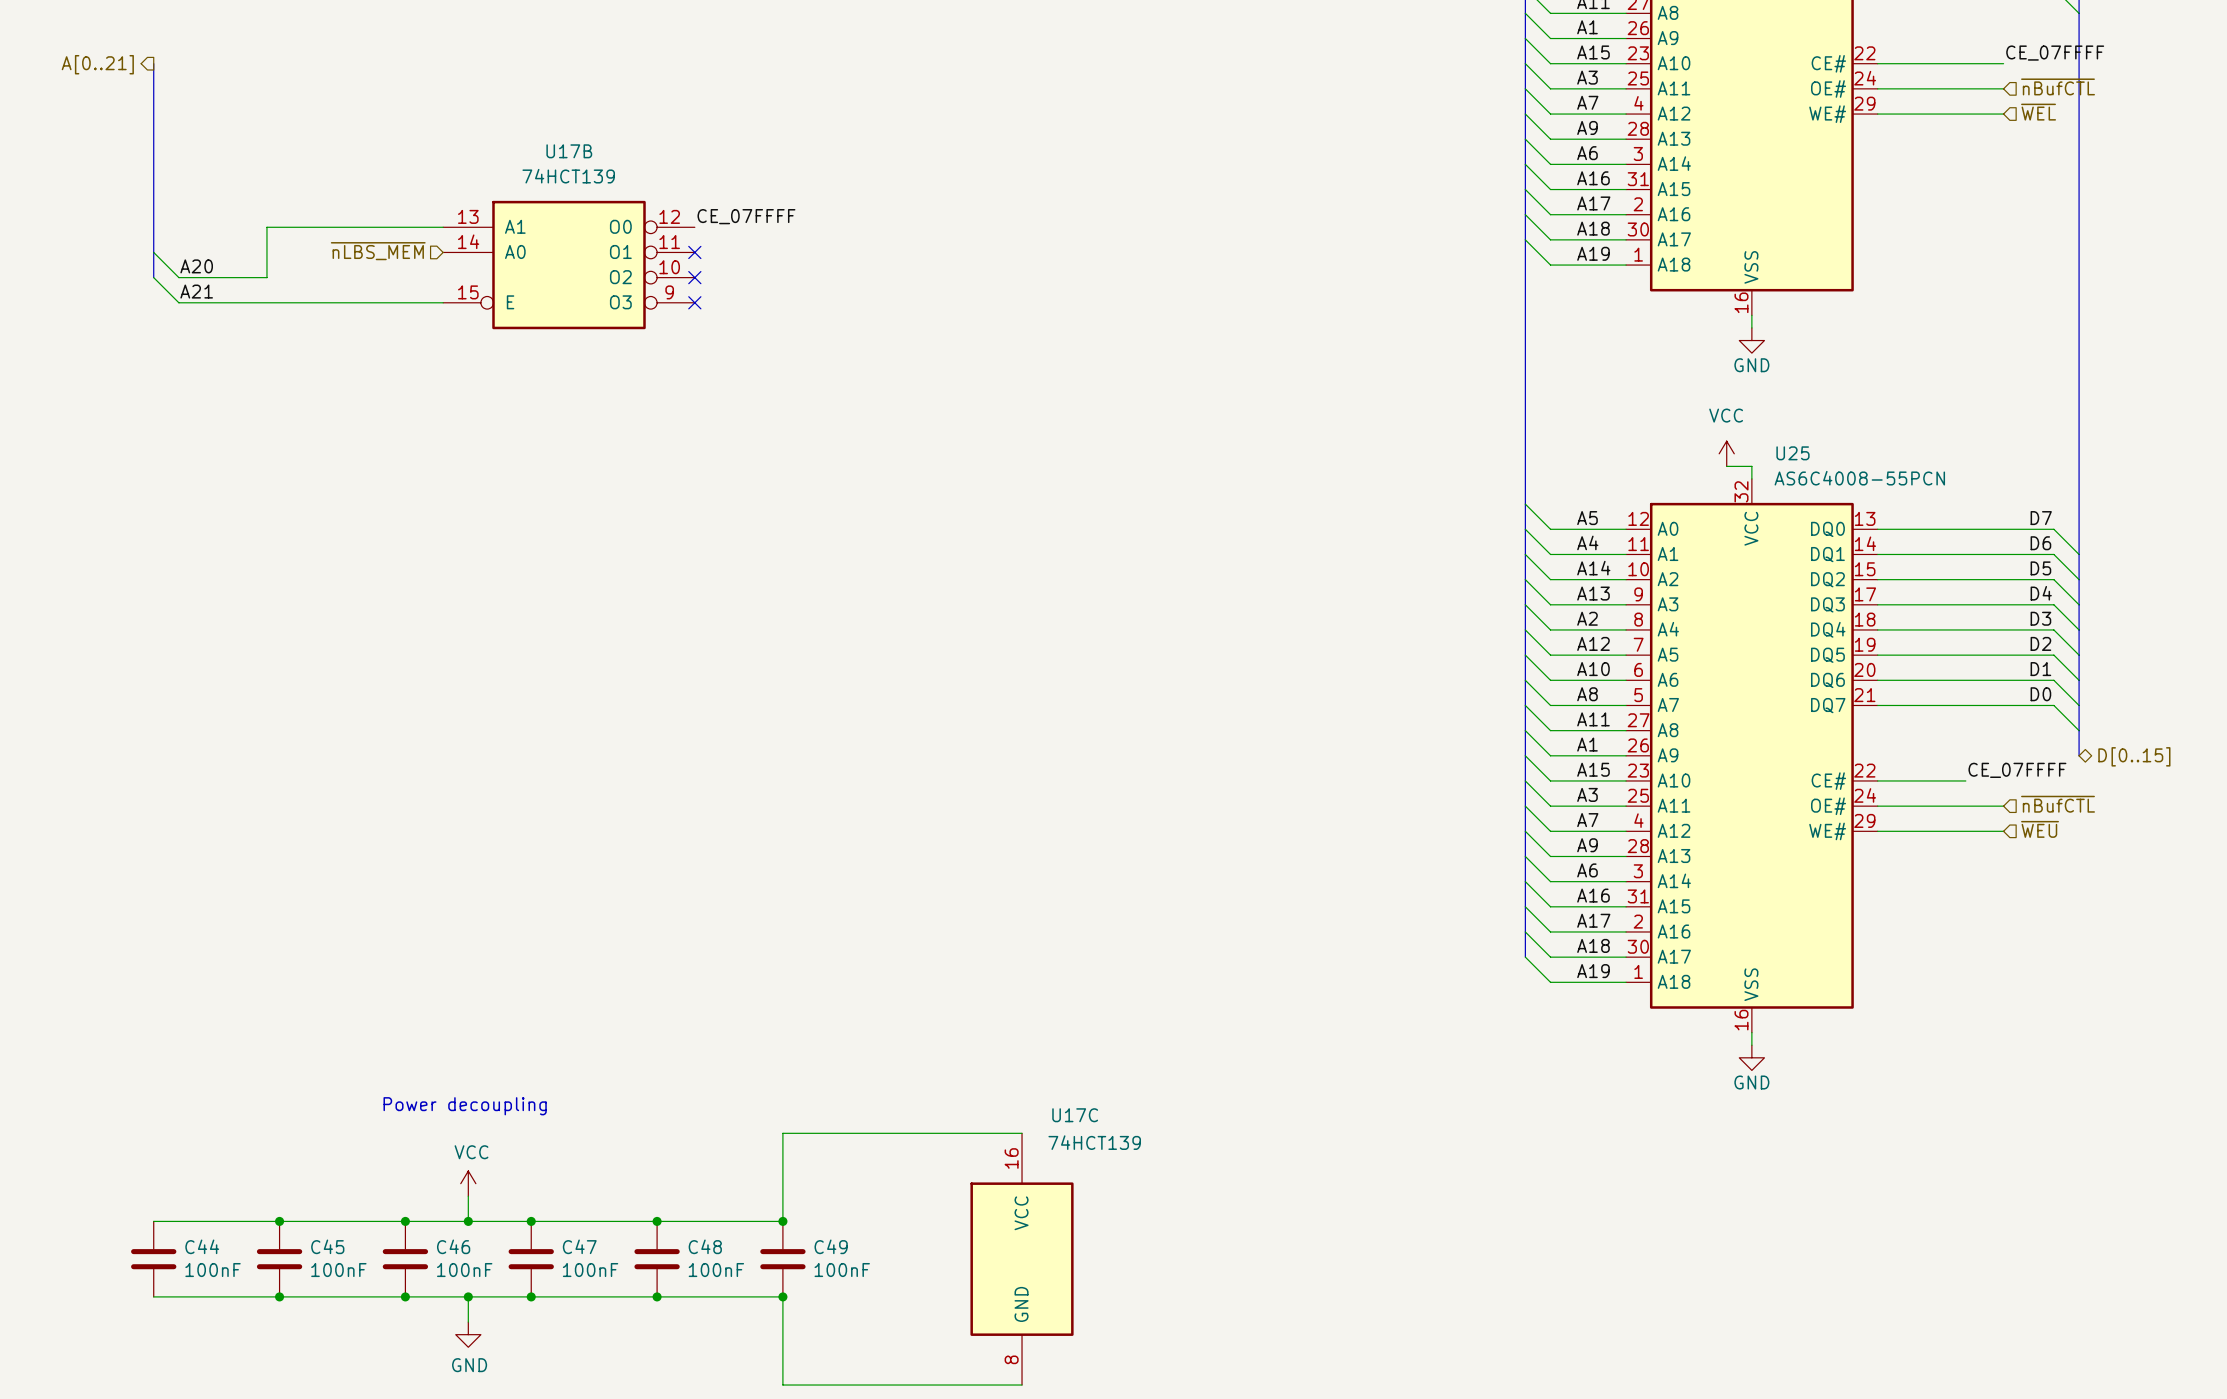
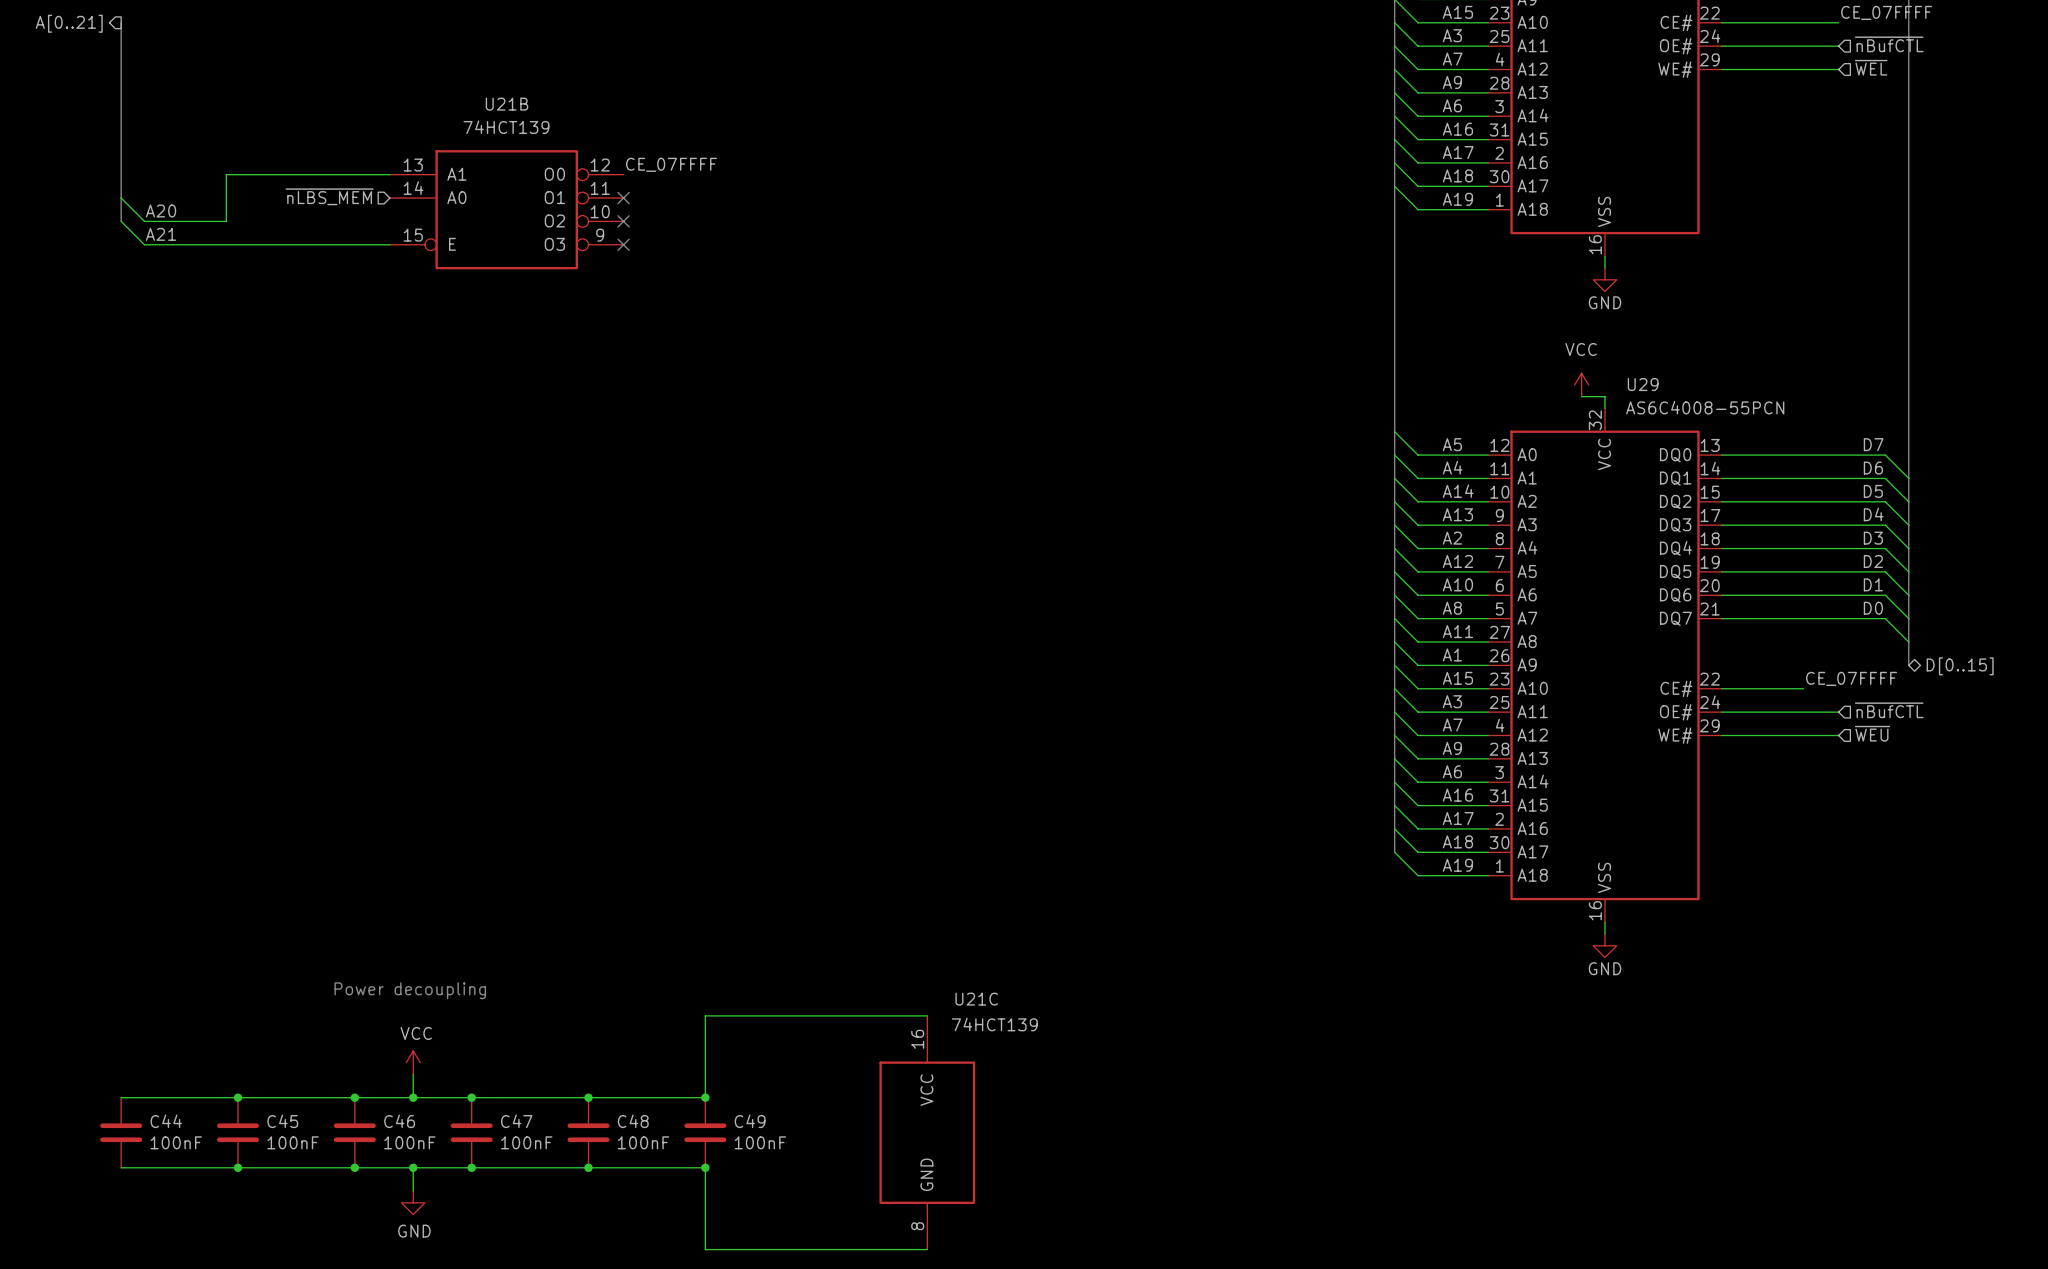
U17B name: U17B (569, 151) -> U21B (507, 104)
U25 name: U25 (1792, 453) -> U29 (1643, 384)
U17C name: U17C (1075, 1115) -> U21C (976, 999)

